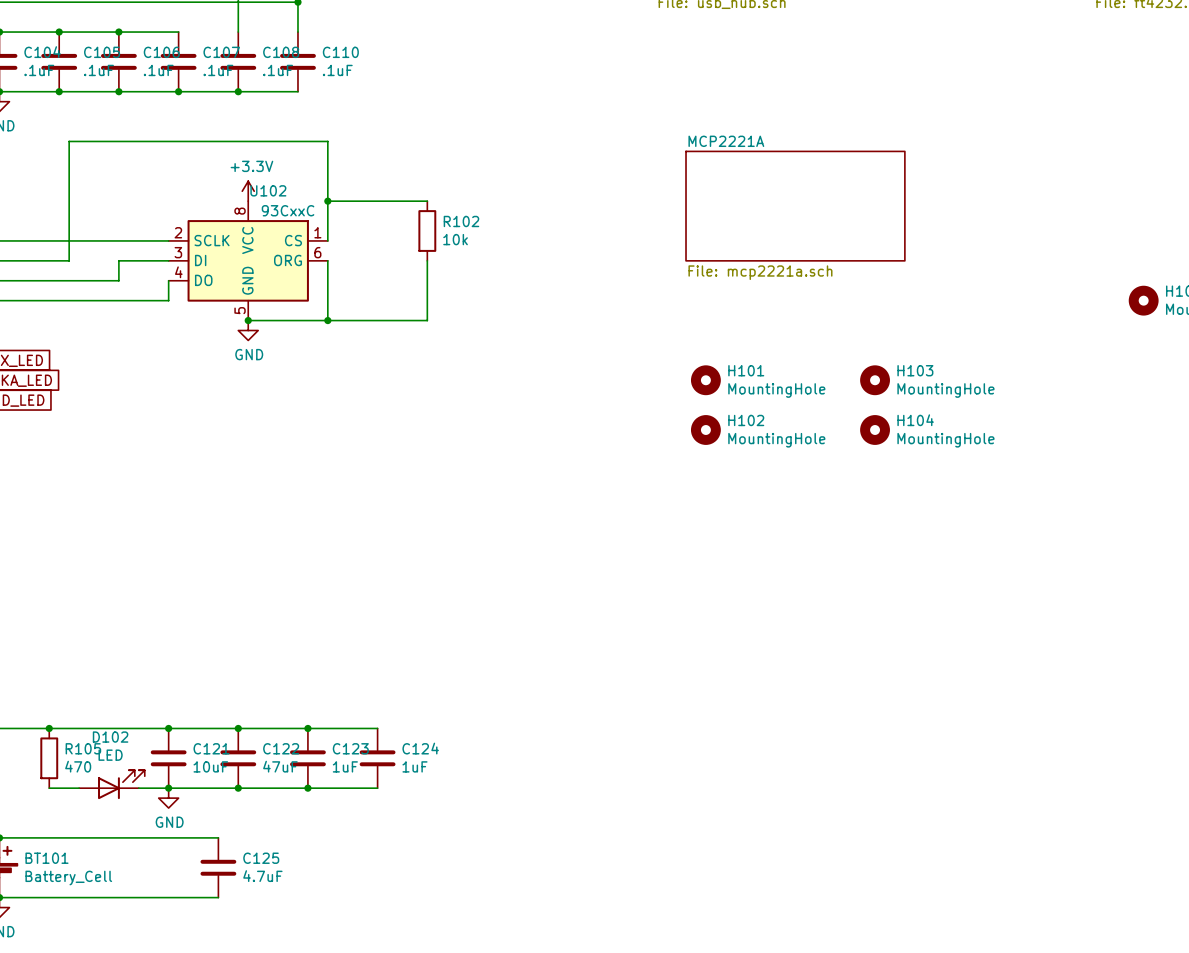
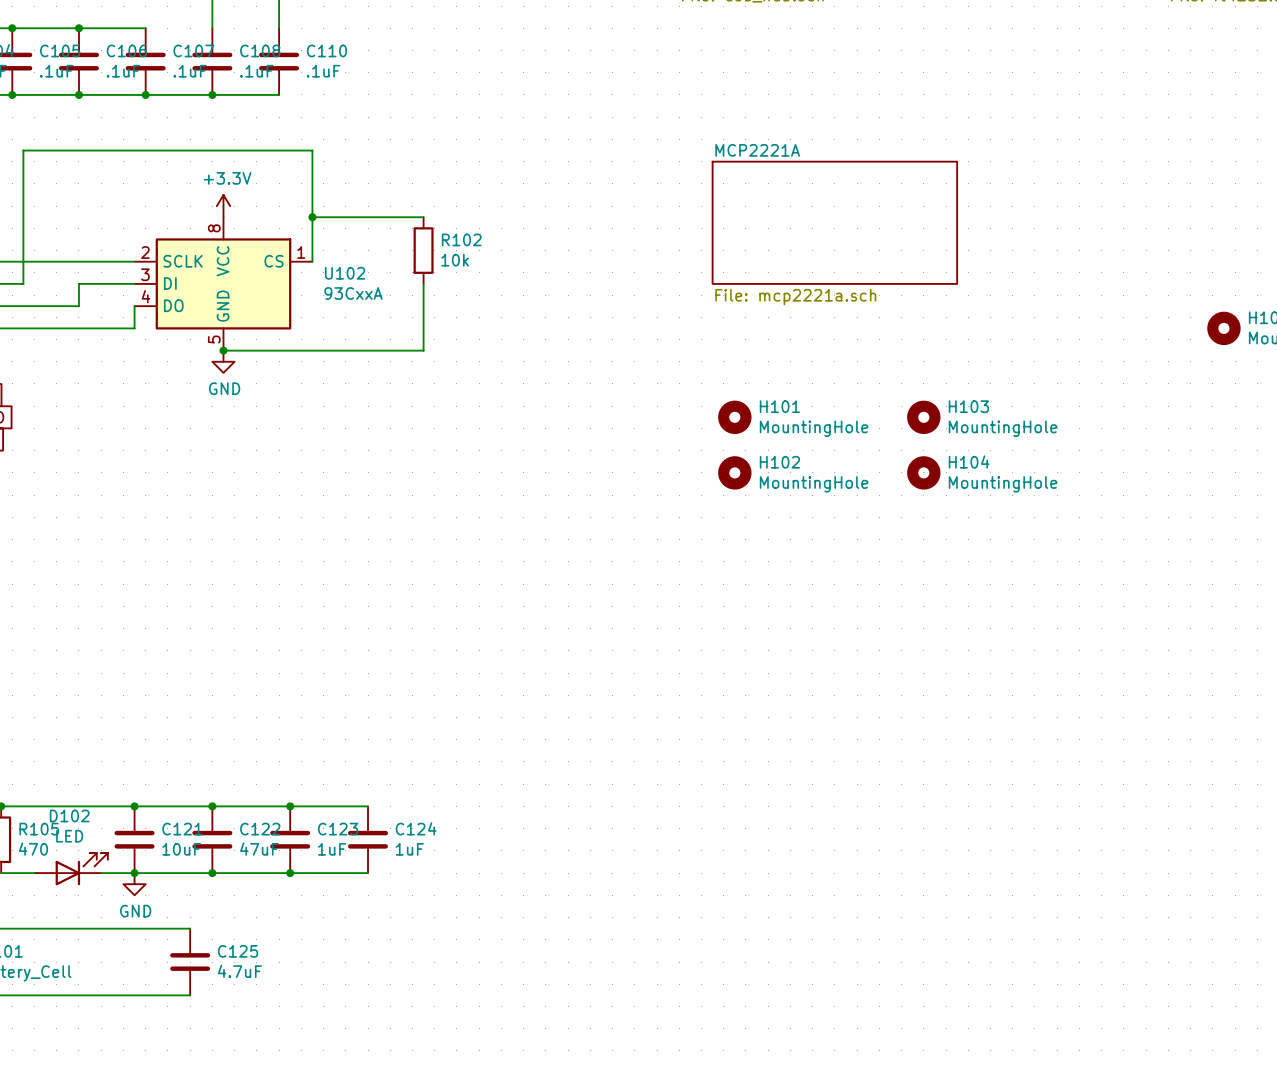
U102 name position: U102 (268, 190) -> U102 (345, 273)
U102 symbol: [168, 201, 328, 321] -> [134, 217, 313, 351]
U102 value: 93CxxC (288, 210) -> 93CxxA (353, 293)
wire: (327, 260) (327, 320) -> none
junction: (327, 320) -> none

